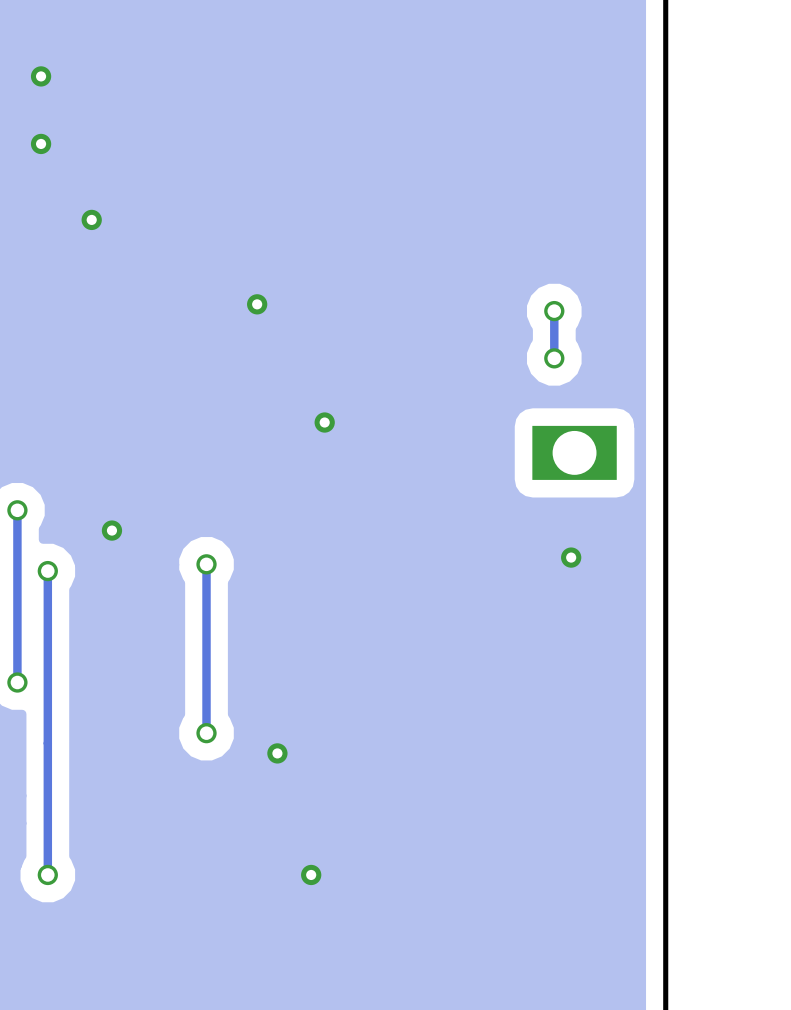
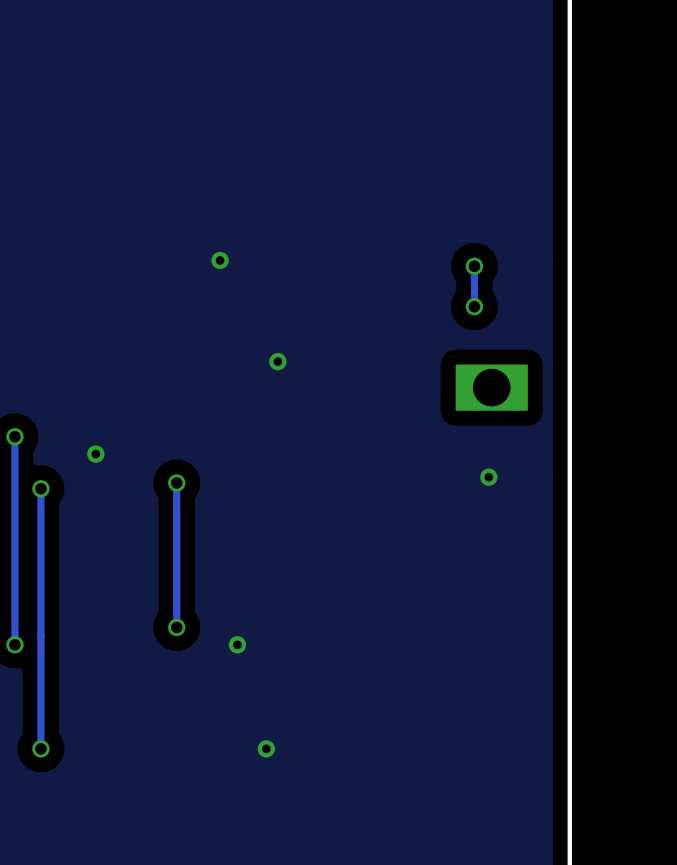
part: (41, 76) -> none
part: (41, 143) -> none
part: (91, 219) -> none
track: none -> (14, 584) (14, 644)
via position: (17, 682) -> (14, 644)

